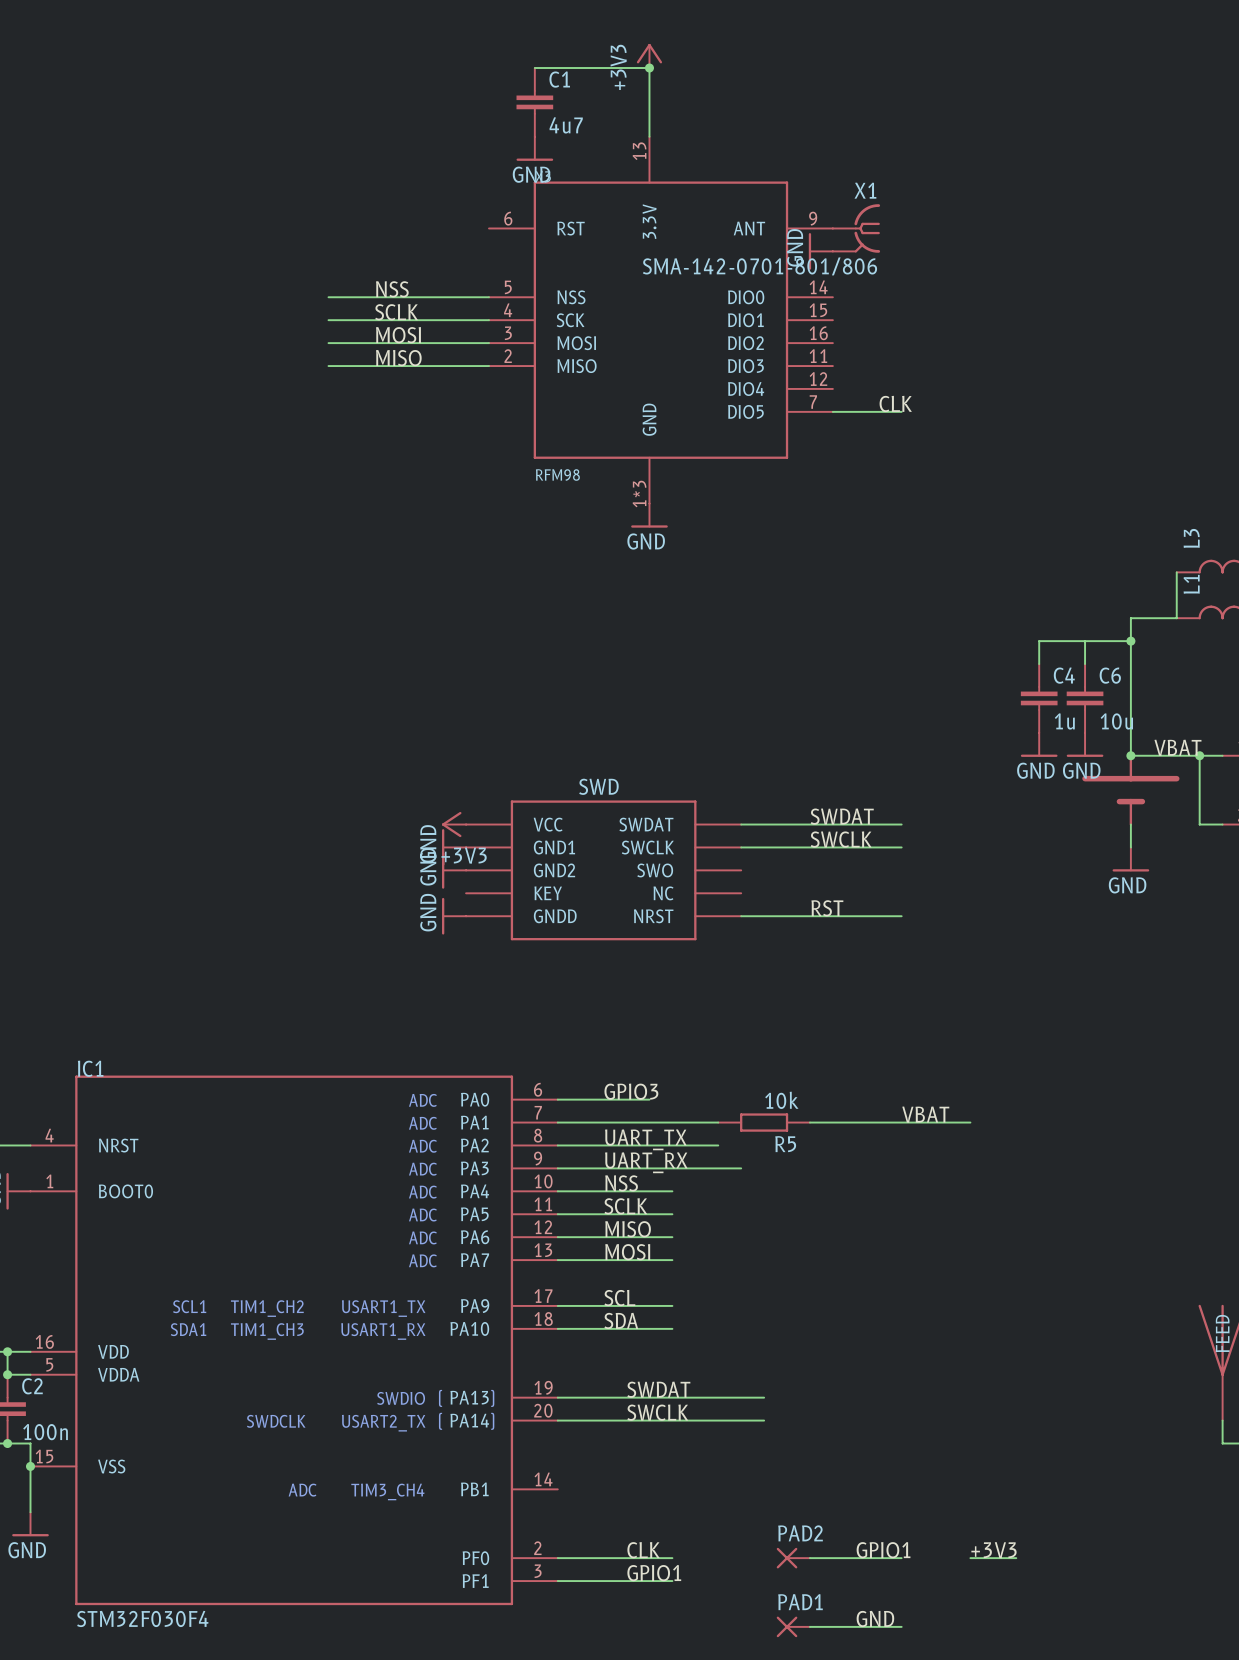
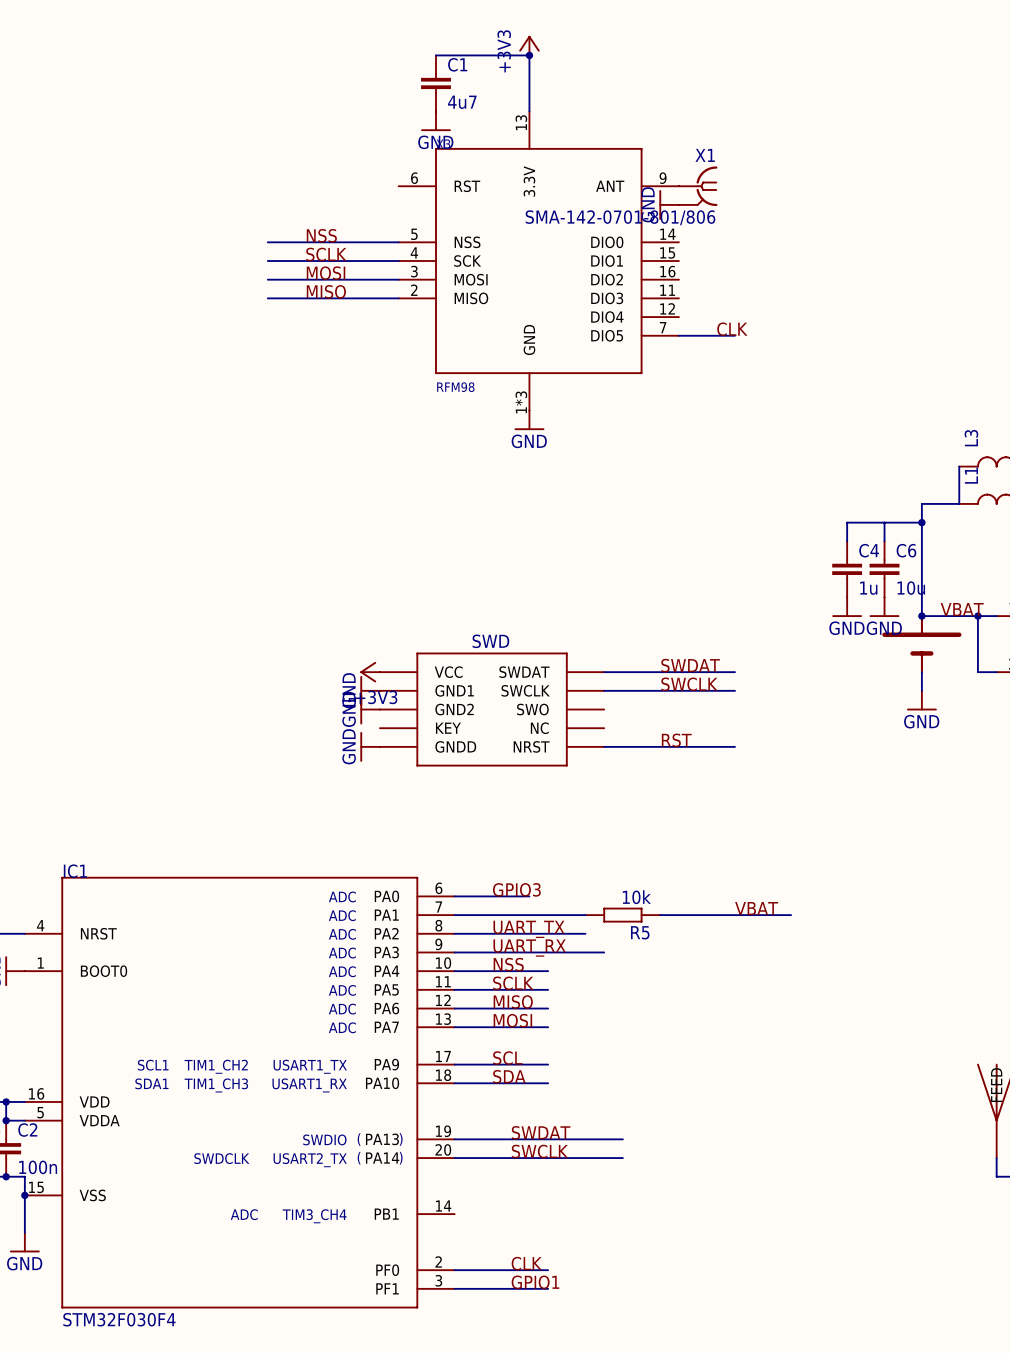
label: GPIO1 (883, 1550) -> none
label: +3V3 (993, 1550) -> none
PAD2: (793, 1558) -> none
wire: (809, 1558) (901, 1558) -> none
wire: (970, 1558) (1016, 1558) -> none
label: GND (875, 1618) -> none
PAD1: (793, 1626) -> none
wire: (809, 1626) (901, 1626) -> none

